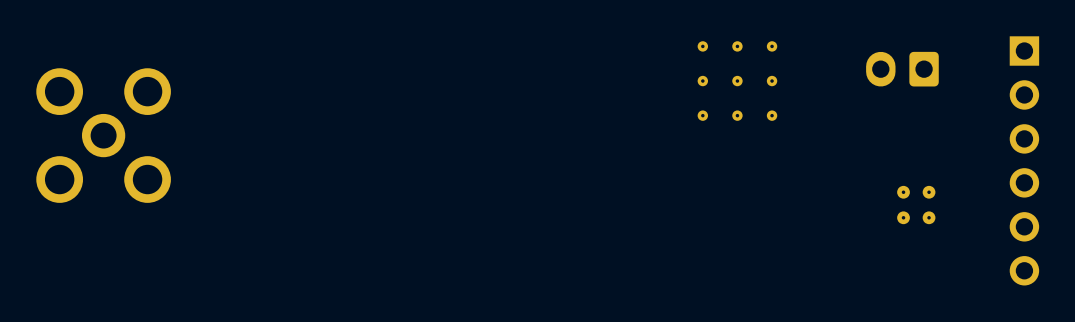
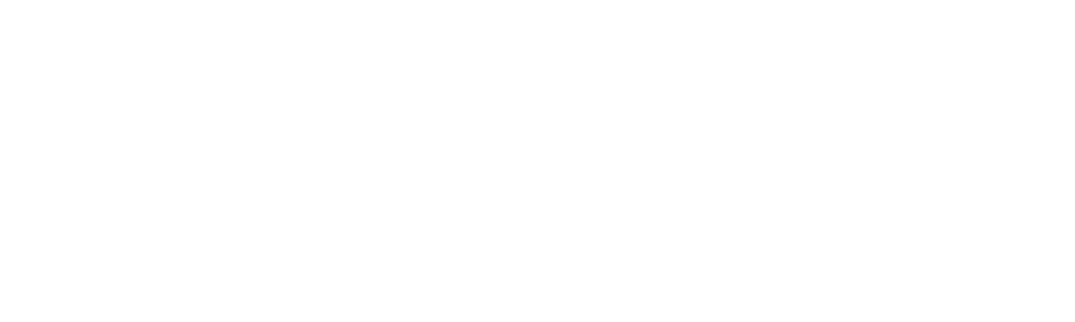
part: (902, 69) -> none
part: (737, 81) -> none
part: (103, 135) -> none
part: (1024, 160) -> none
part: (916, 205) -> none

